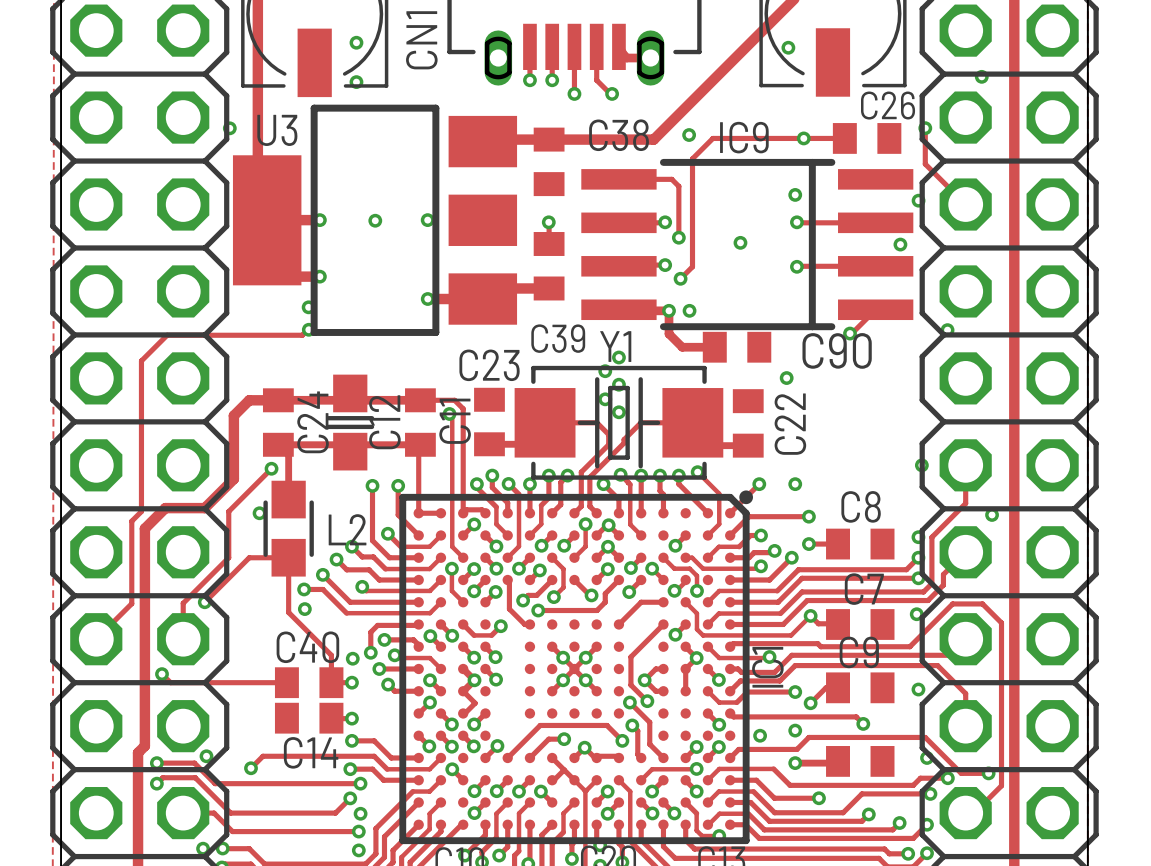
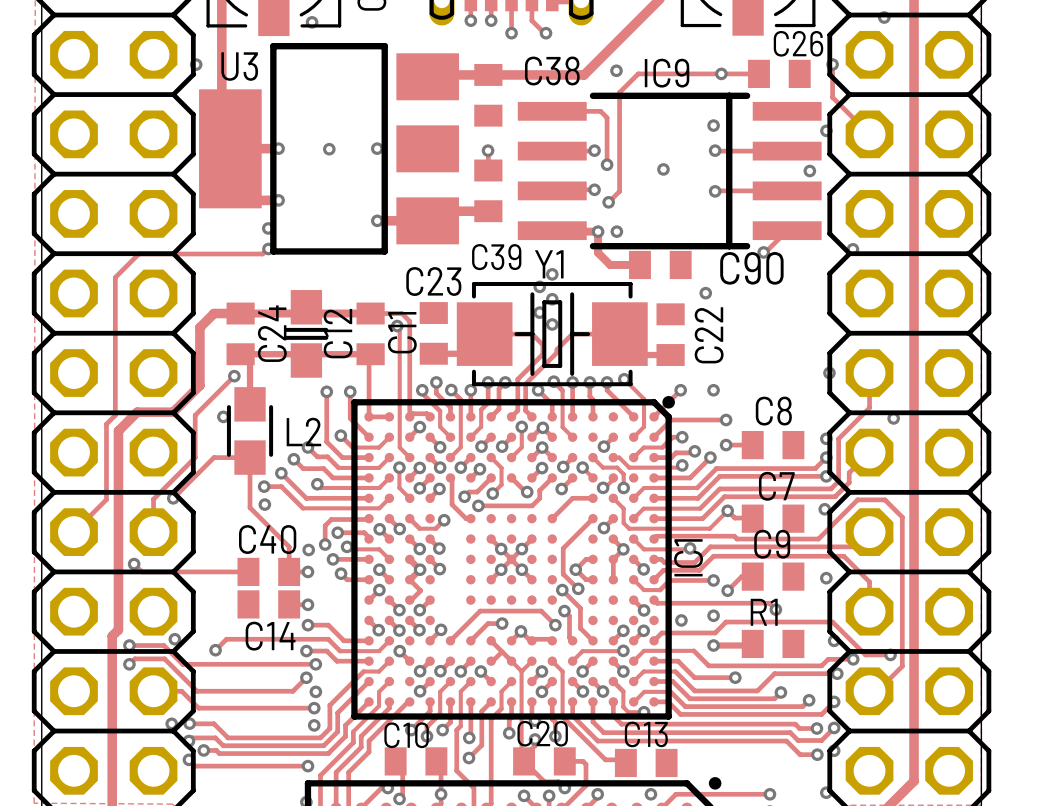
R1 name: none -> R1 (764, 612)

